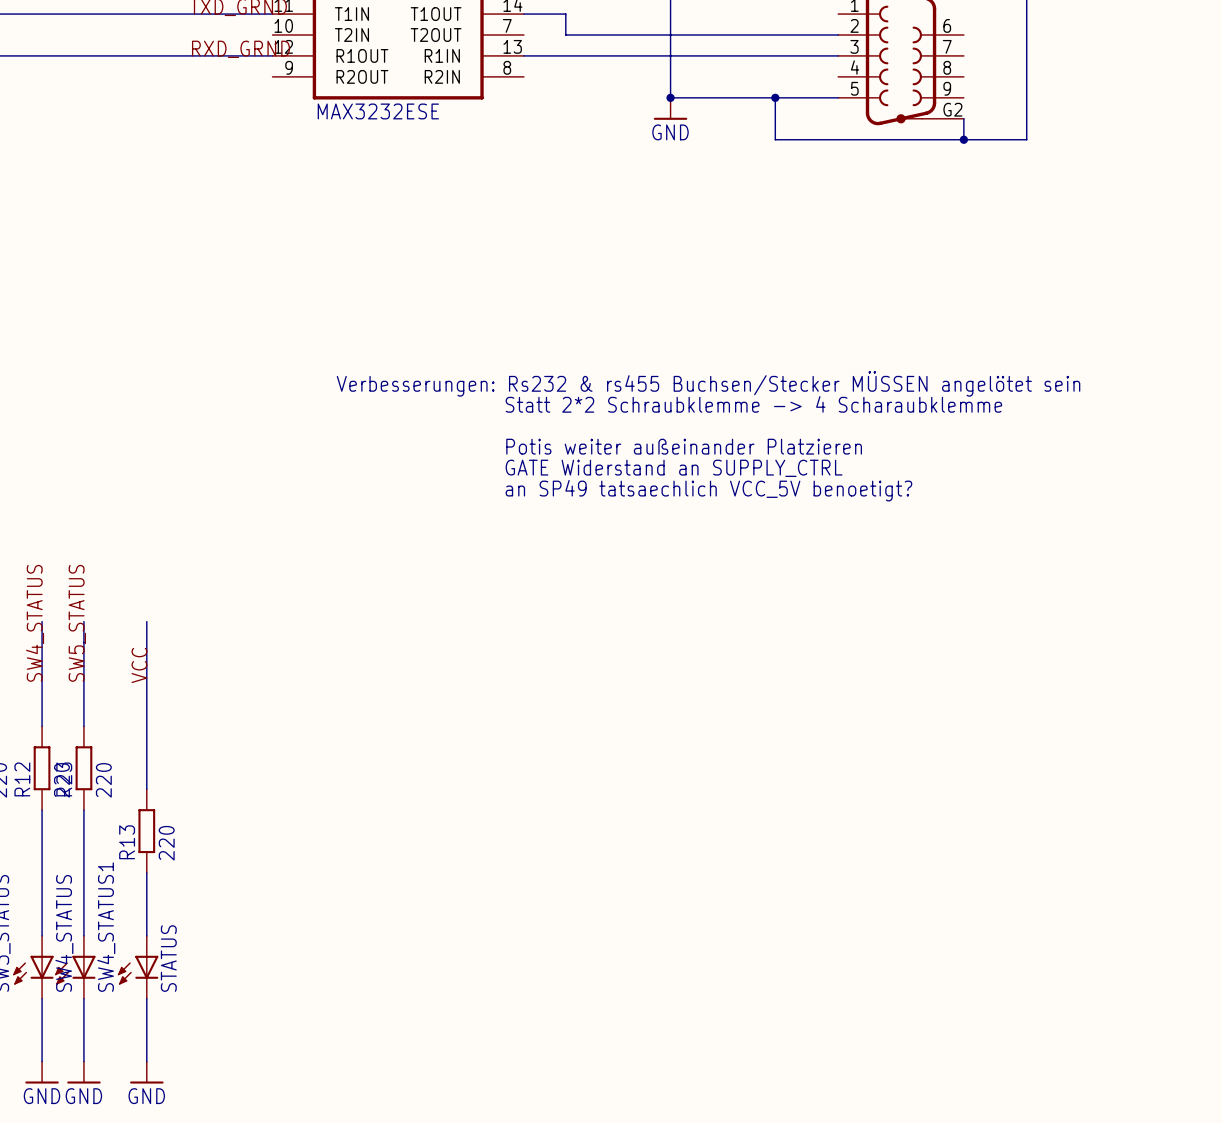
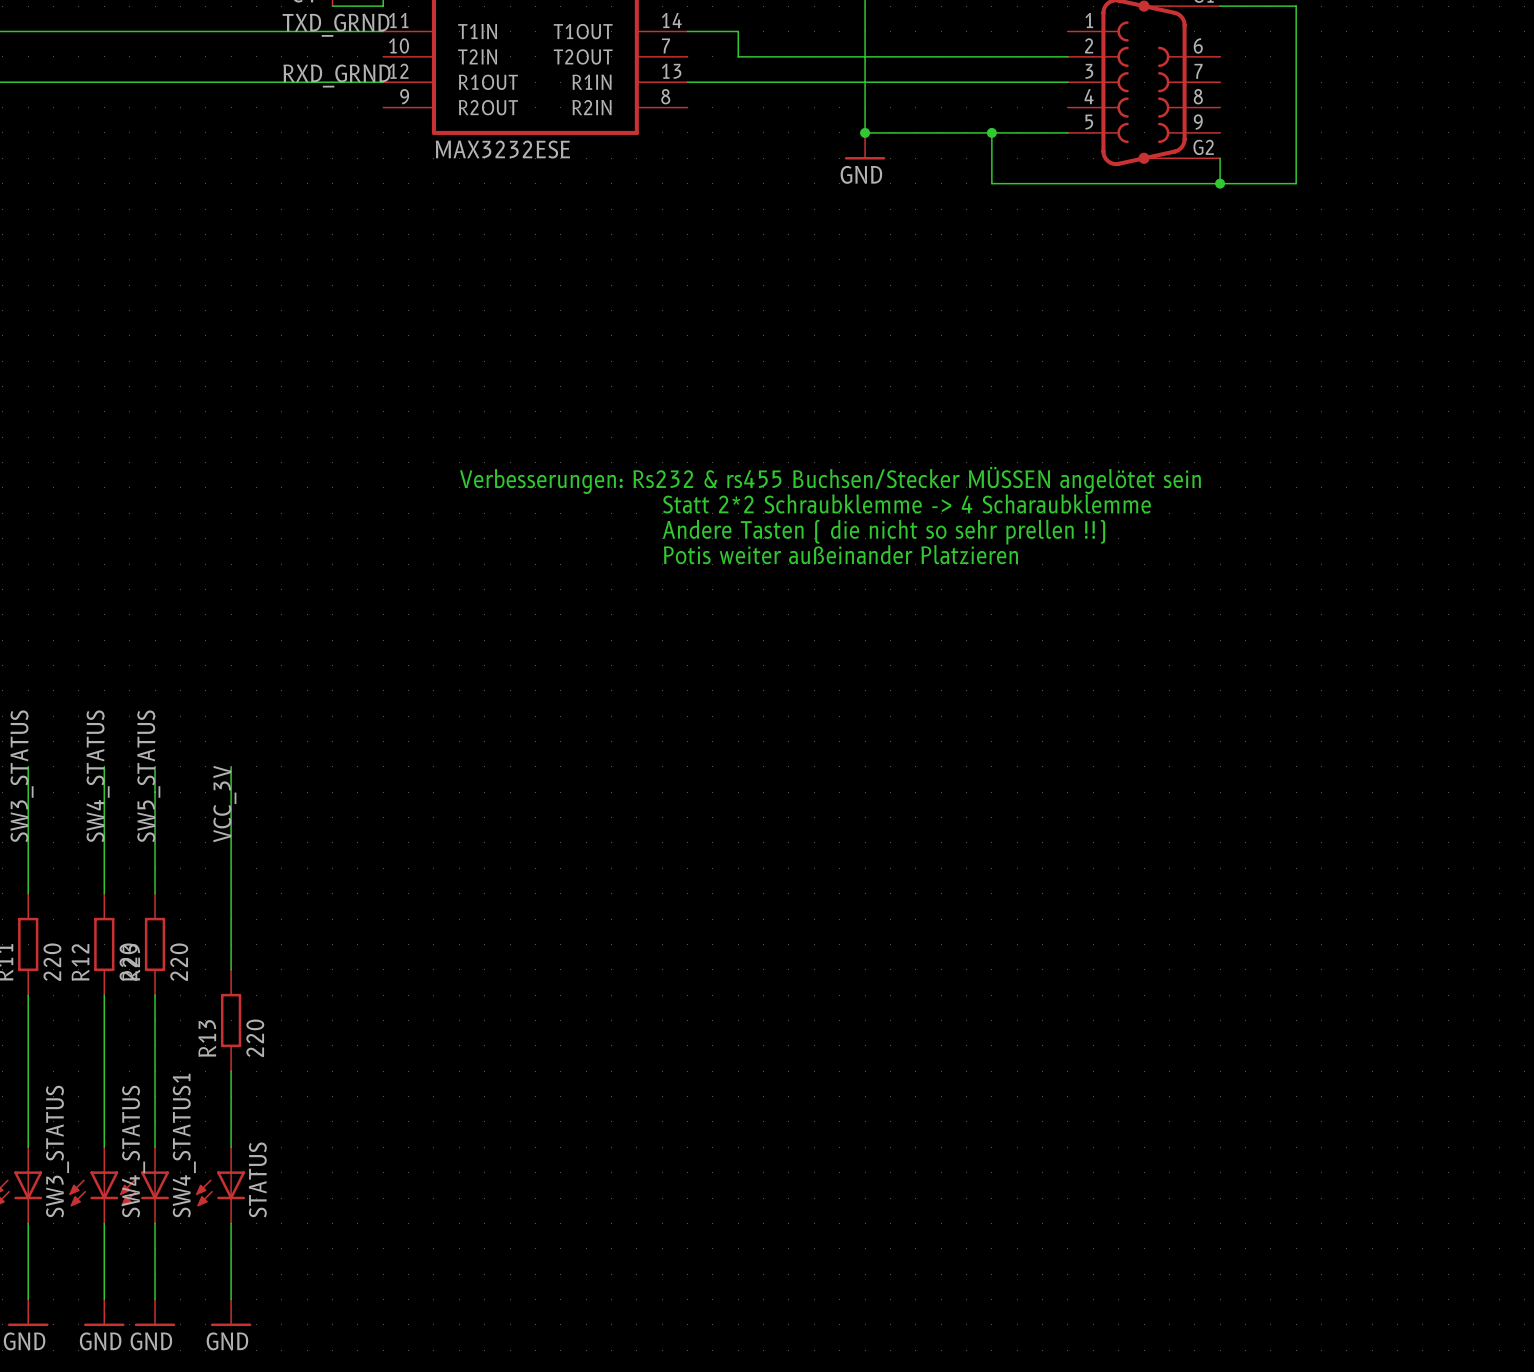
text: none -> Andere Tasten ( die nicht so sehr prellen !!) (884, 532)
text: GATE Widerstand an SUPPLY_CTRL (674, 468) -> none
text: an SP49 tatsaechlich VCC_5V benoetigt? (708, 490) -> none
label: VCC (139, 665) -> VCC_3V (224, 804)

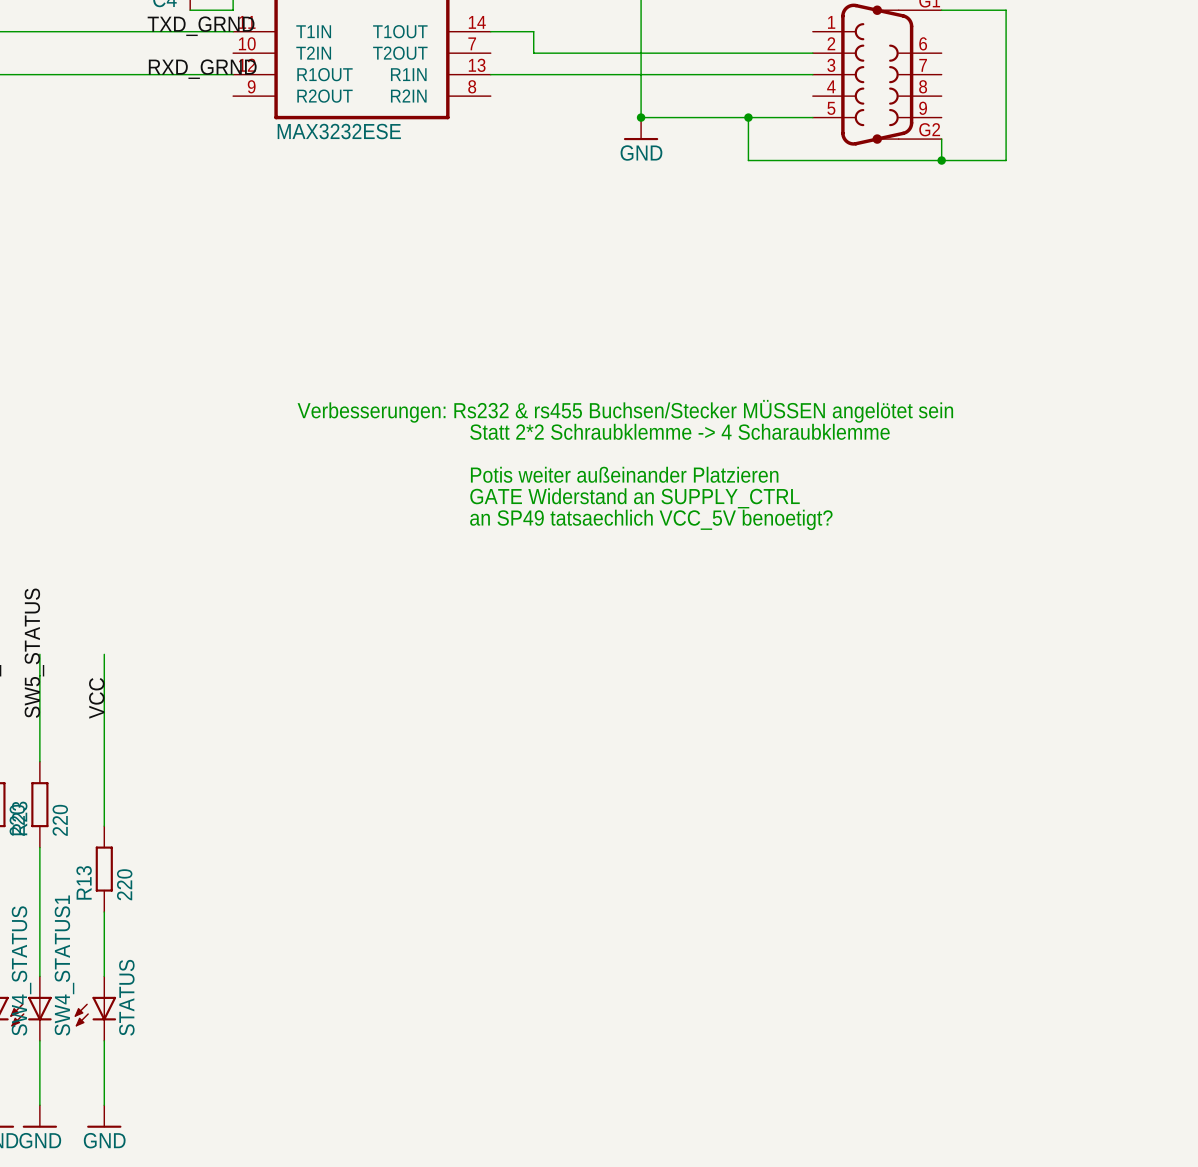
text: Andere Tasten ( die nicht so sehr prellen !!) (884, 532) -> none
text: none -> GATE Widerstand an SUPPLY_CTRL (635, 498)
text: none -> an SP49 tatsaechlich VCC_5V benoetigt? (651, 519)
label: VCC_3V (224, 804) -> VCC (96, 698)

